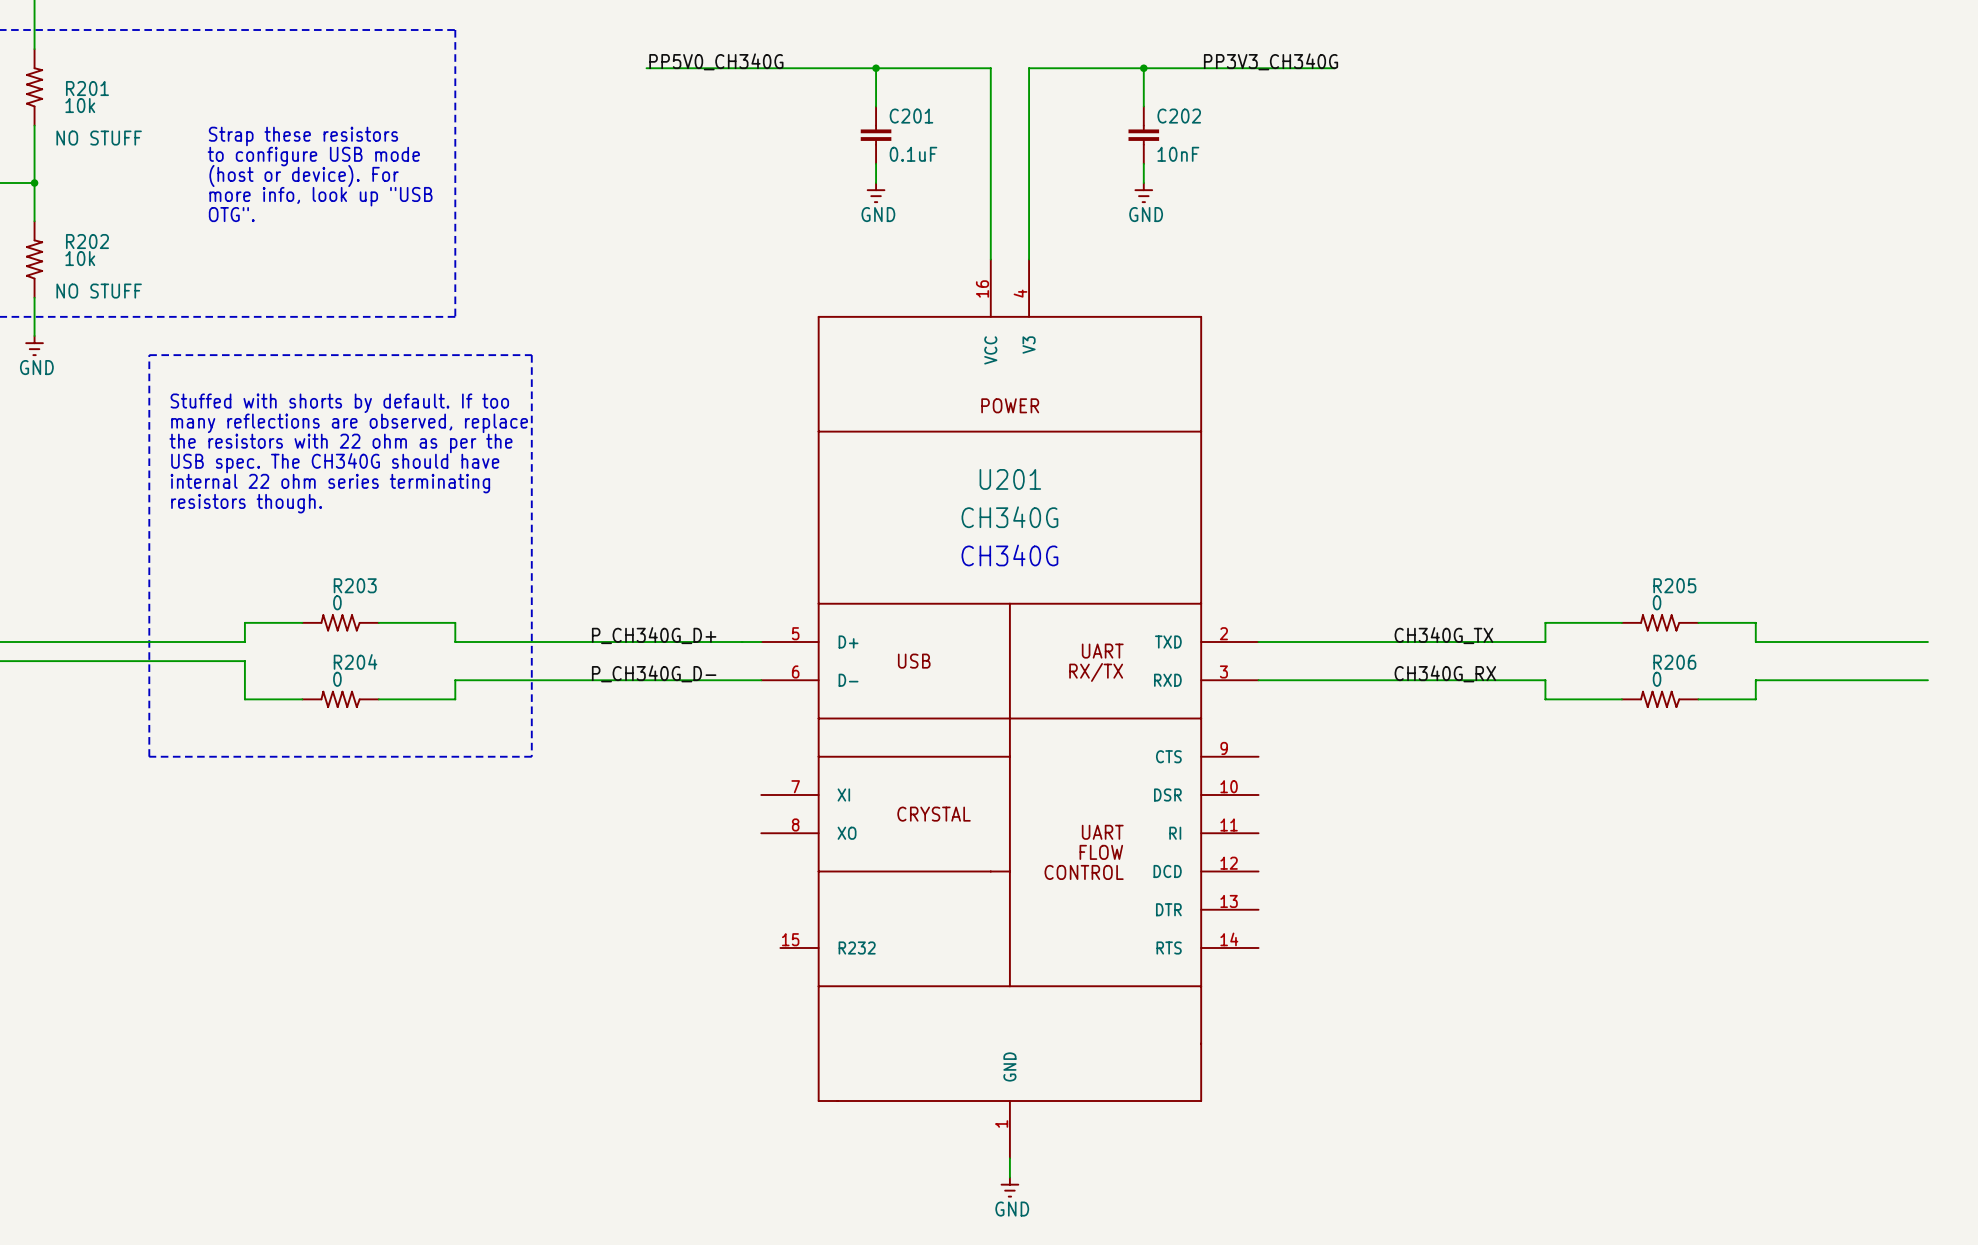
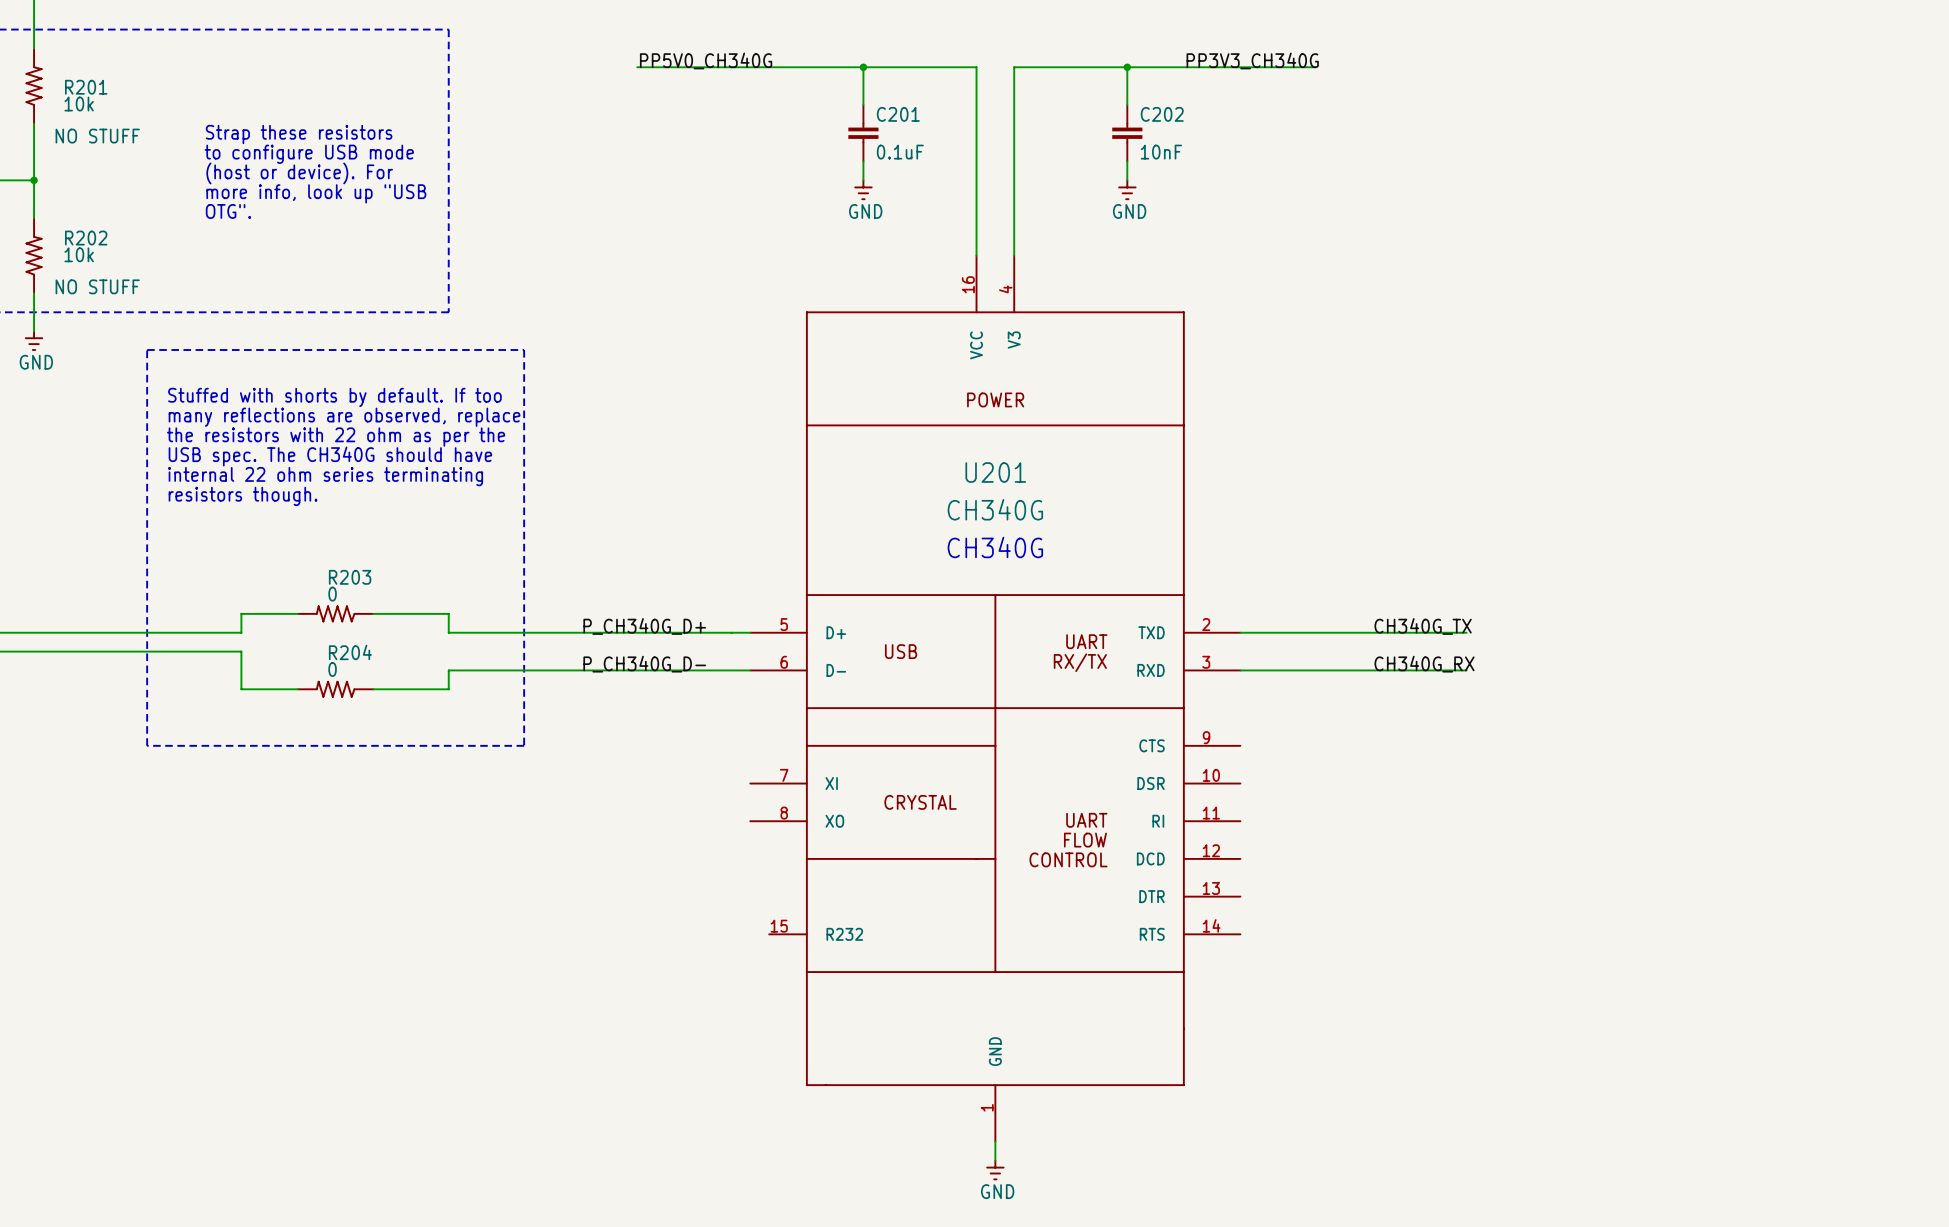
wire: (1621, 622) (1545, 622) (1545, 642) (1488, 642) -> none
R205: 0 (1660, 622) -> none
wire: (1698, 622) (1755, 622) (1755, 642) (1927, 642) -> none
wire: (1488, 680) (1545, 680) (1545, 699) (1621, 699) -> none
wire: (1927, 680) (1755, 680) (1755, 699) (1698, 699) -> none
R206: 0 (1660, 699) -> none

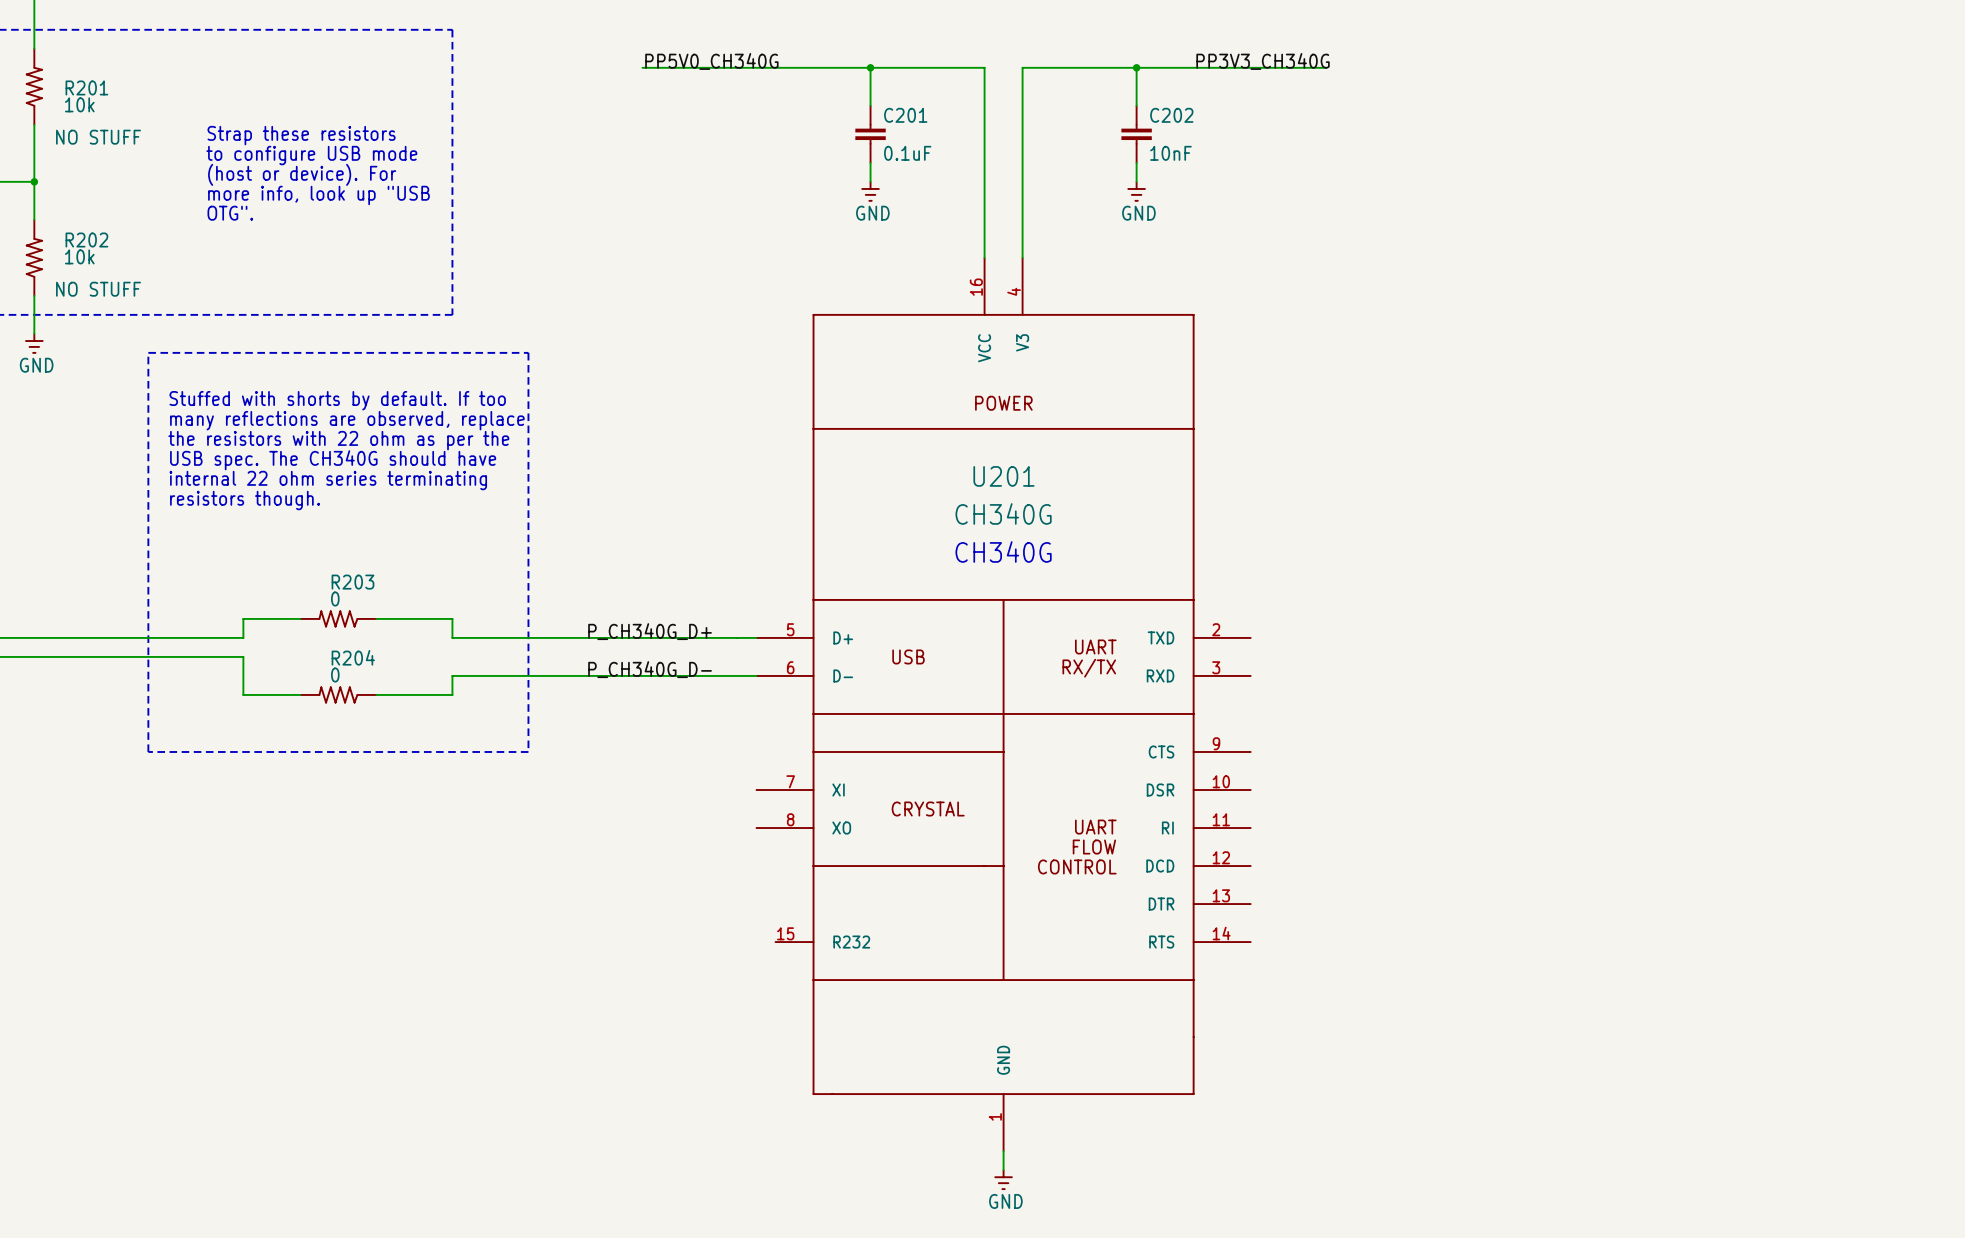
label: CH340G_TX (1423, 626) -> none
wire: (1240, 632) (1466, 632) -> none
label: CH340G_RX (1424, 664) -> none
wire: (1240, 670) (1466, 670) -> none

